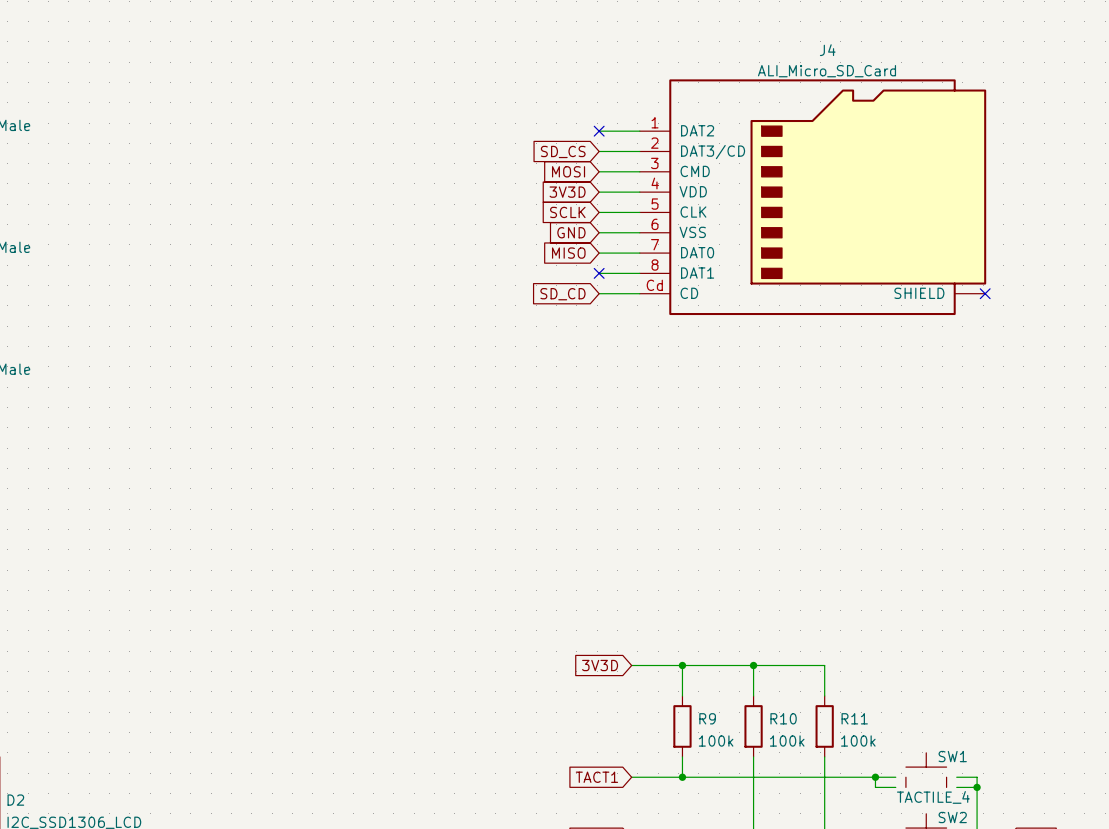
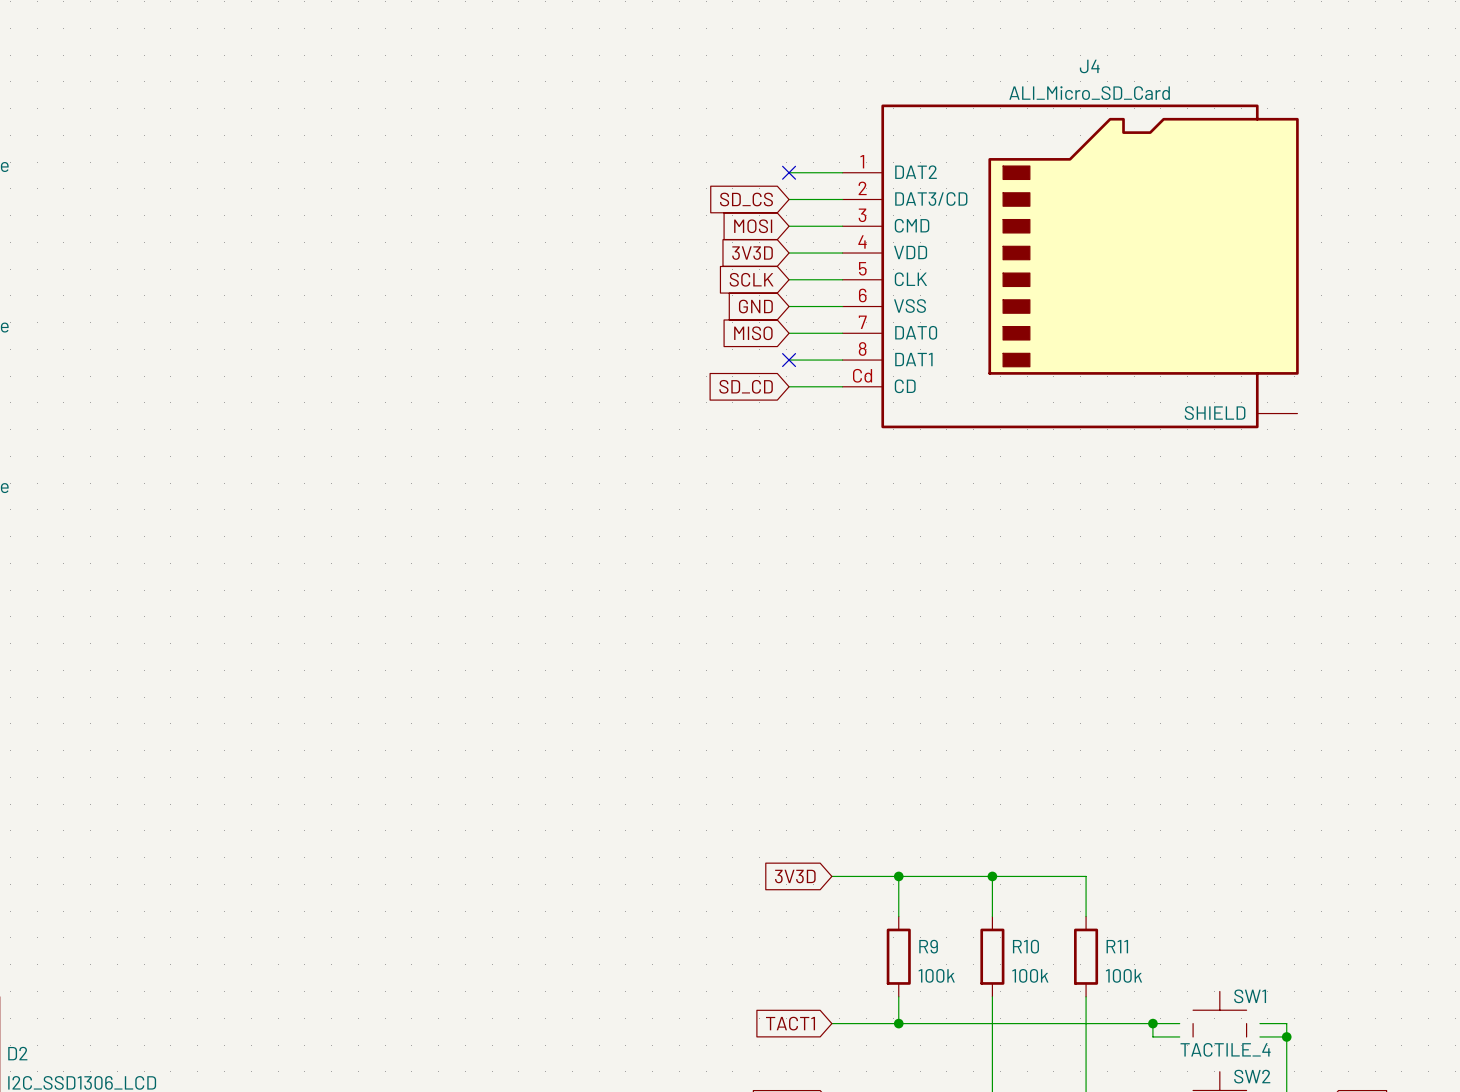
J4 symbol: [639, 79, 987, 316] -> [842, 104, 1299, 429]
no-connect mark: (985, 293) -> none

